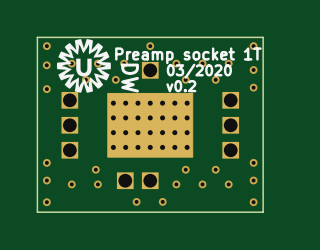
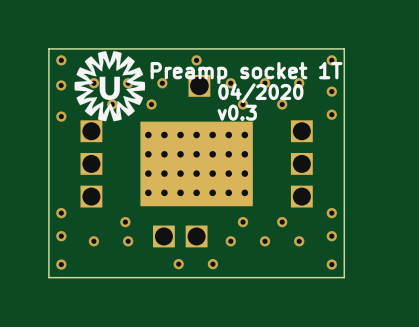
part footprint: [141, 61, 159, 79] -> [188, 74, 211, 97]
text: 03/2020 (199, 71) -> 04/2020 (260, 93)
text: DW (130, 78) -> none
text: v0.2 (181, 86) -> v0.3 (237, 112)

